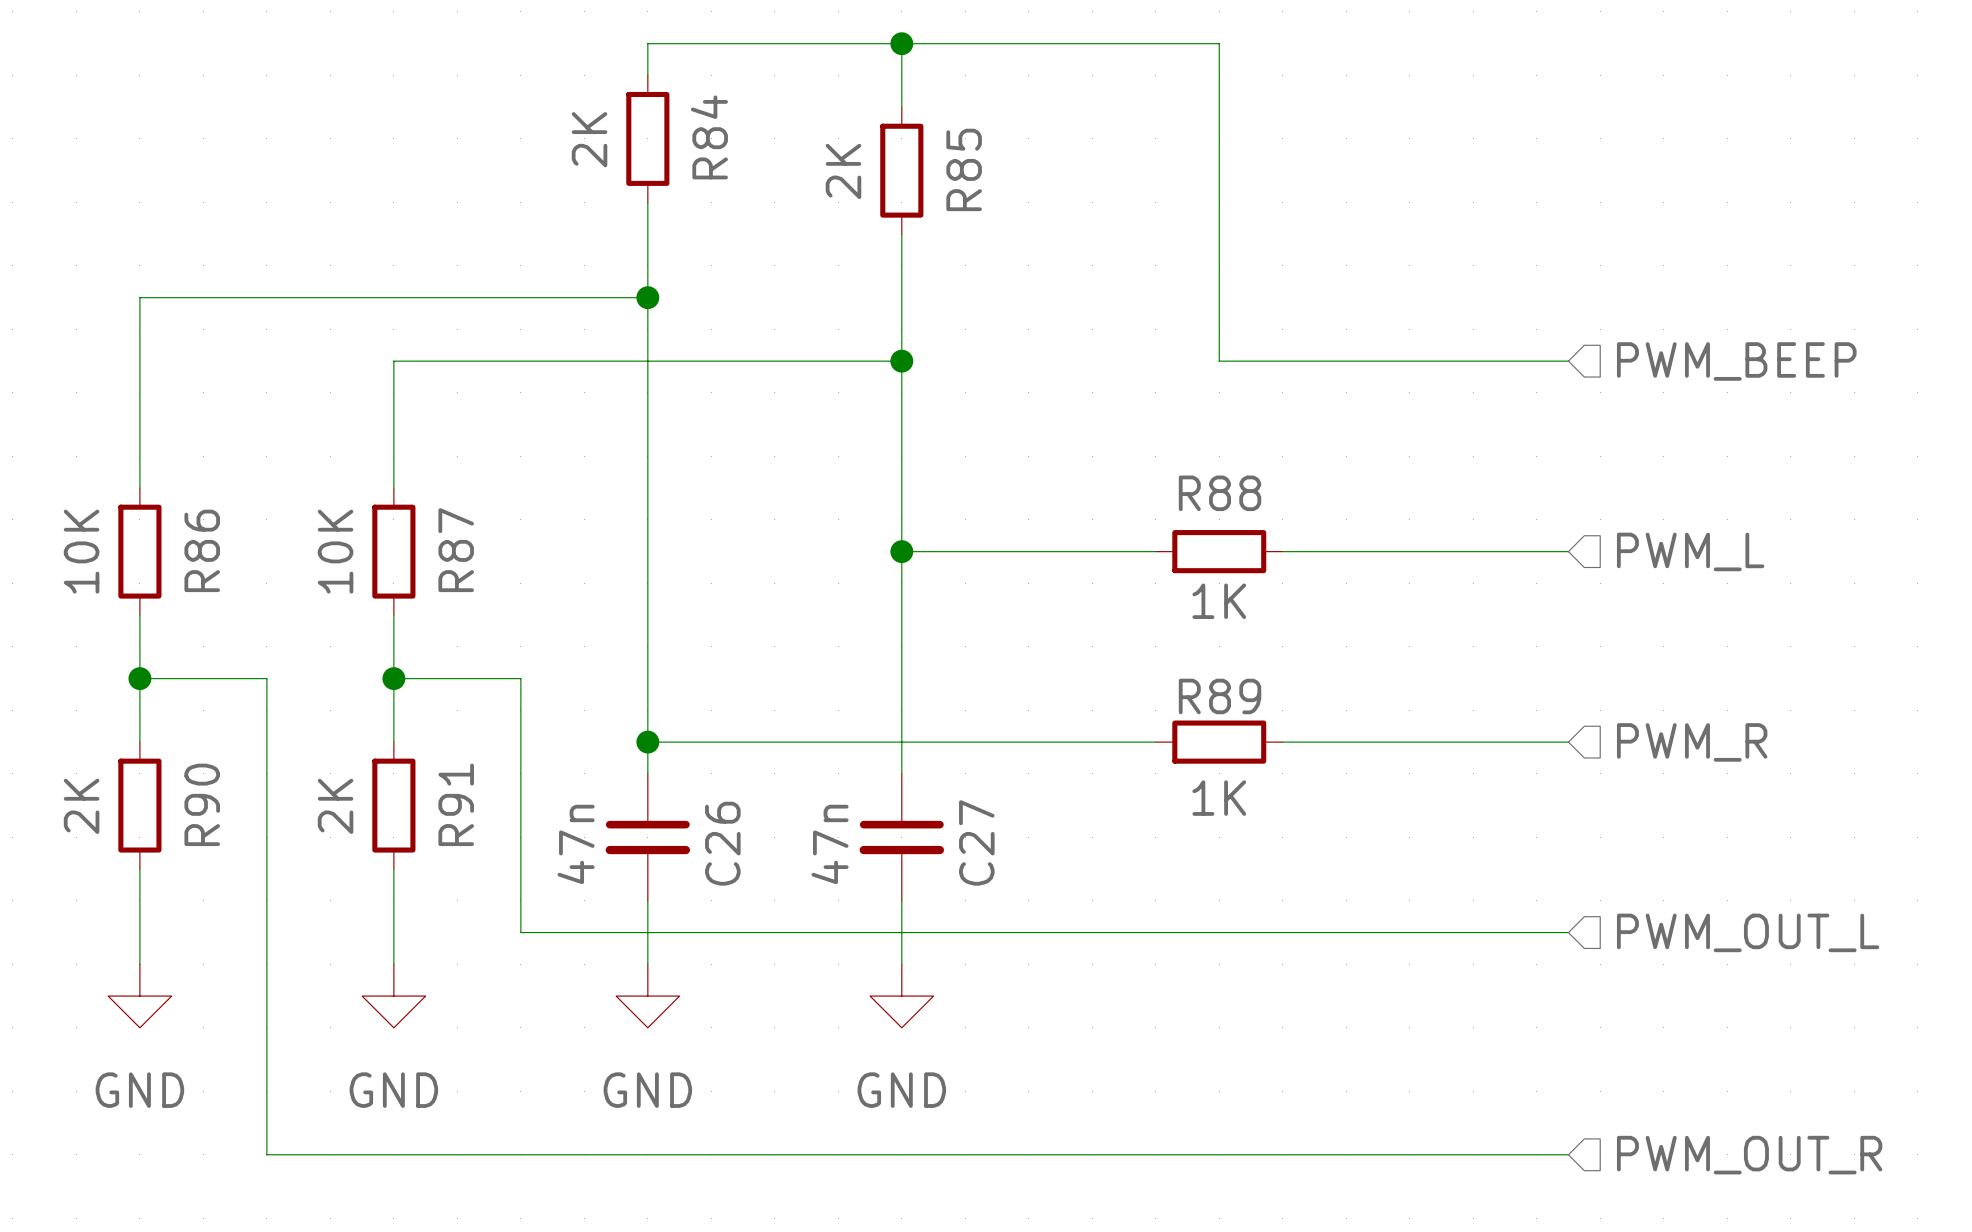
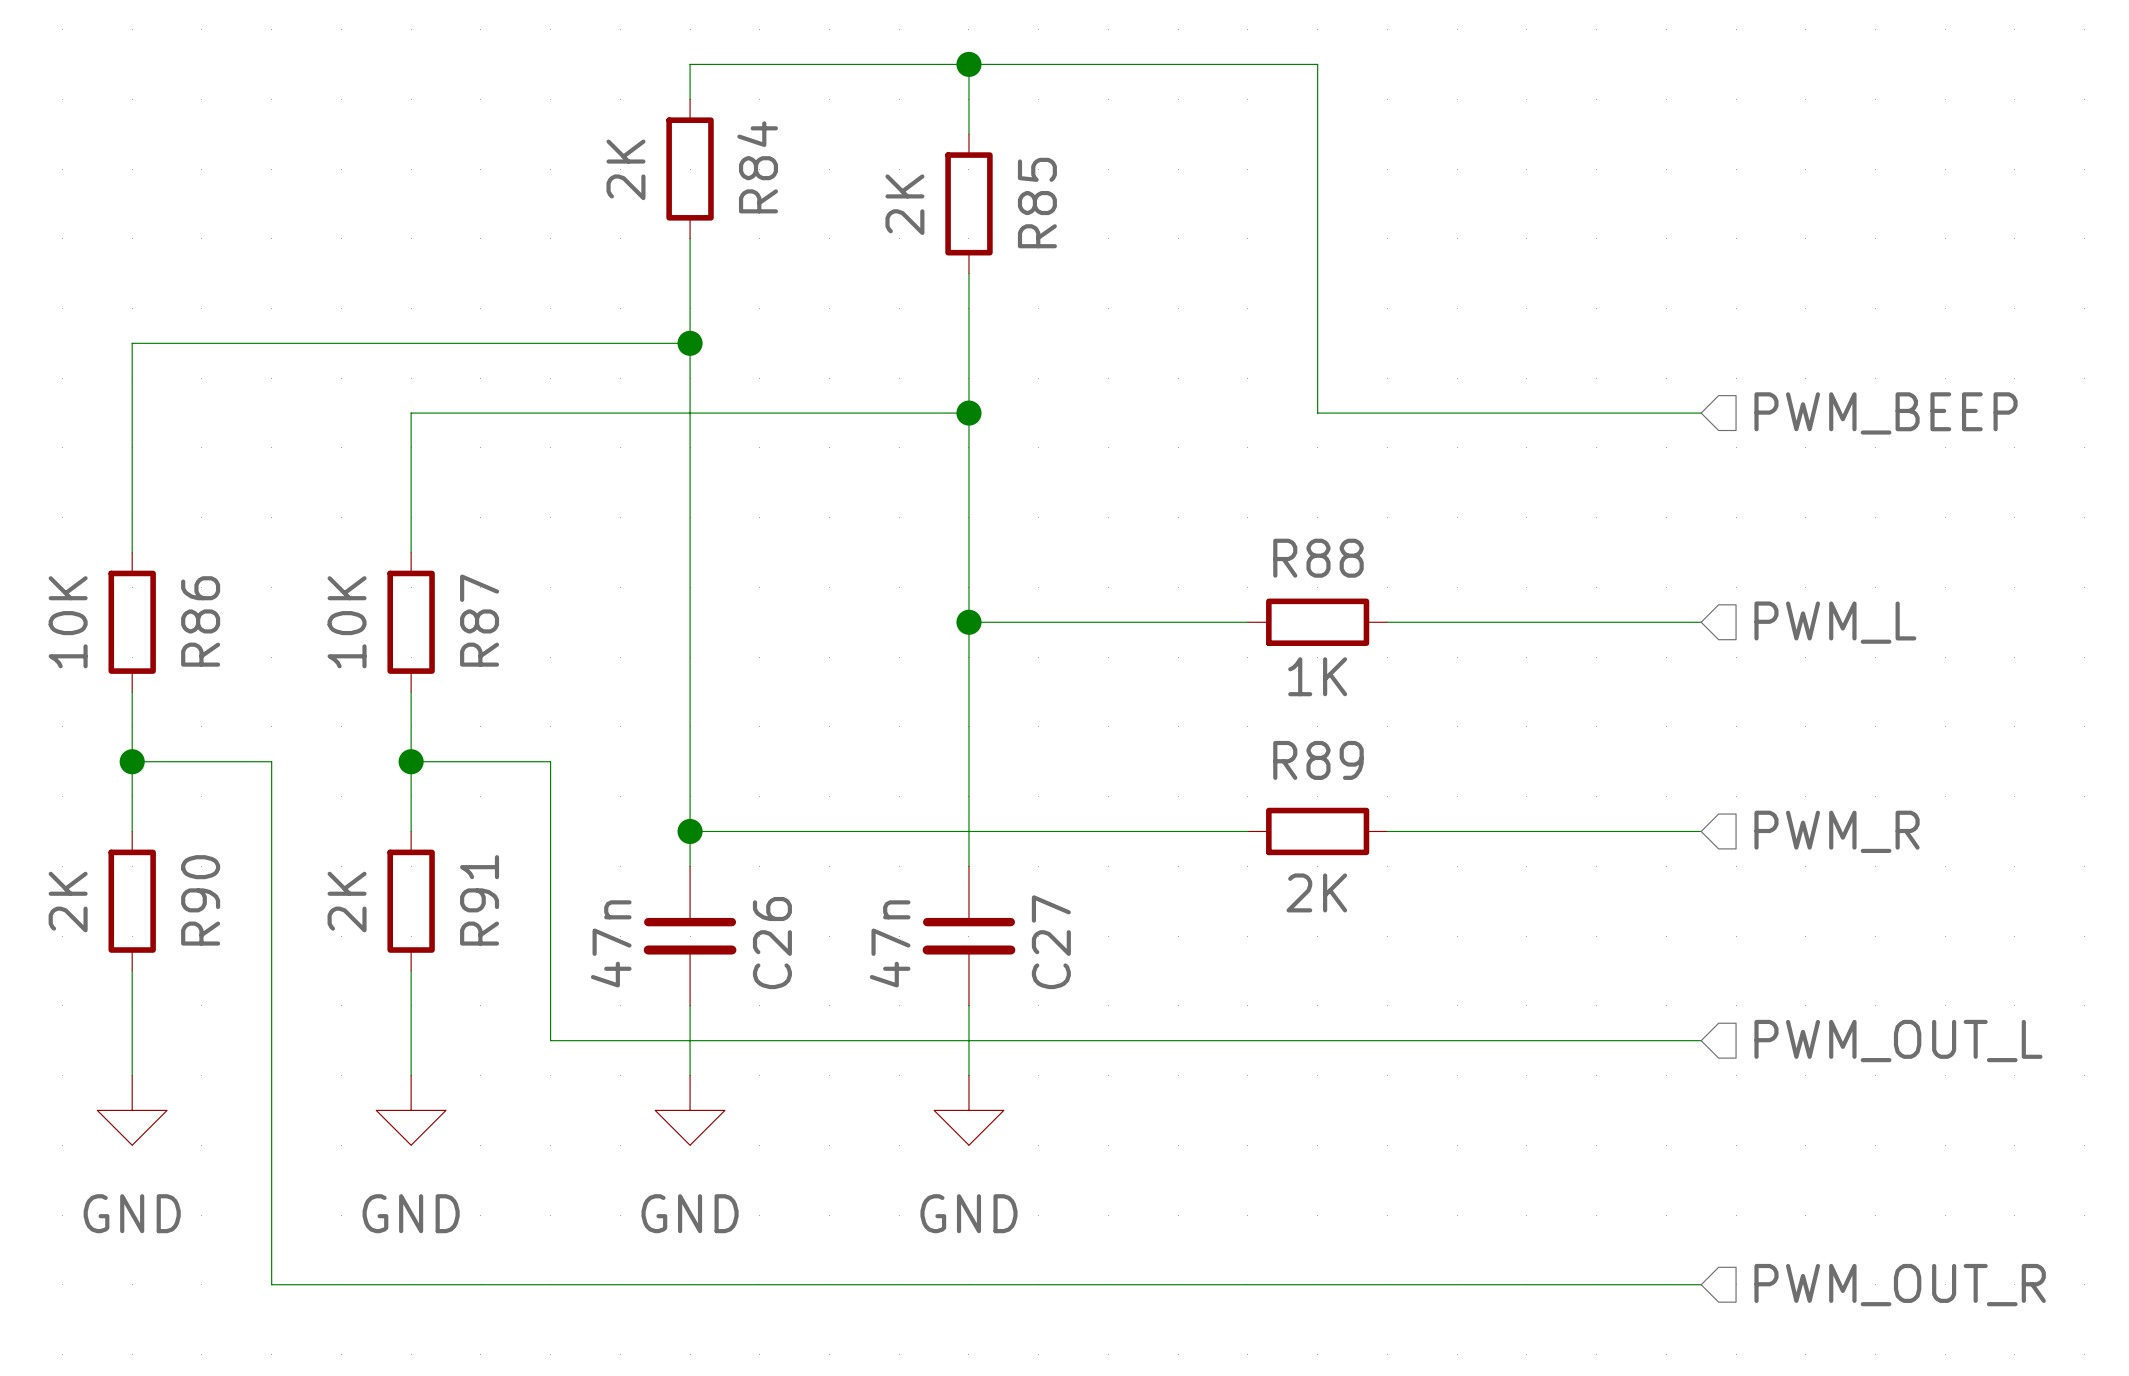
R89 name position: R89 (1220, 696) -> R89 (1318, 760)
R89 value: 1K (1219, 798) -> 2K (1316, 892)

